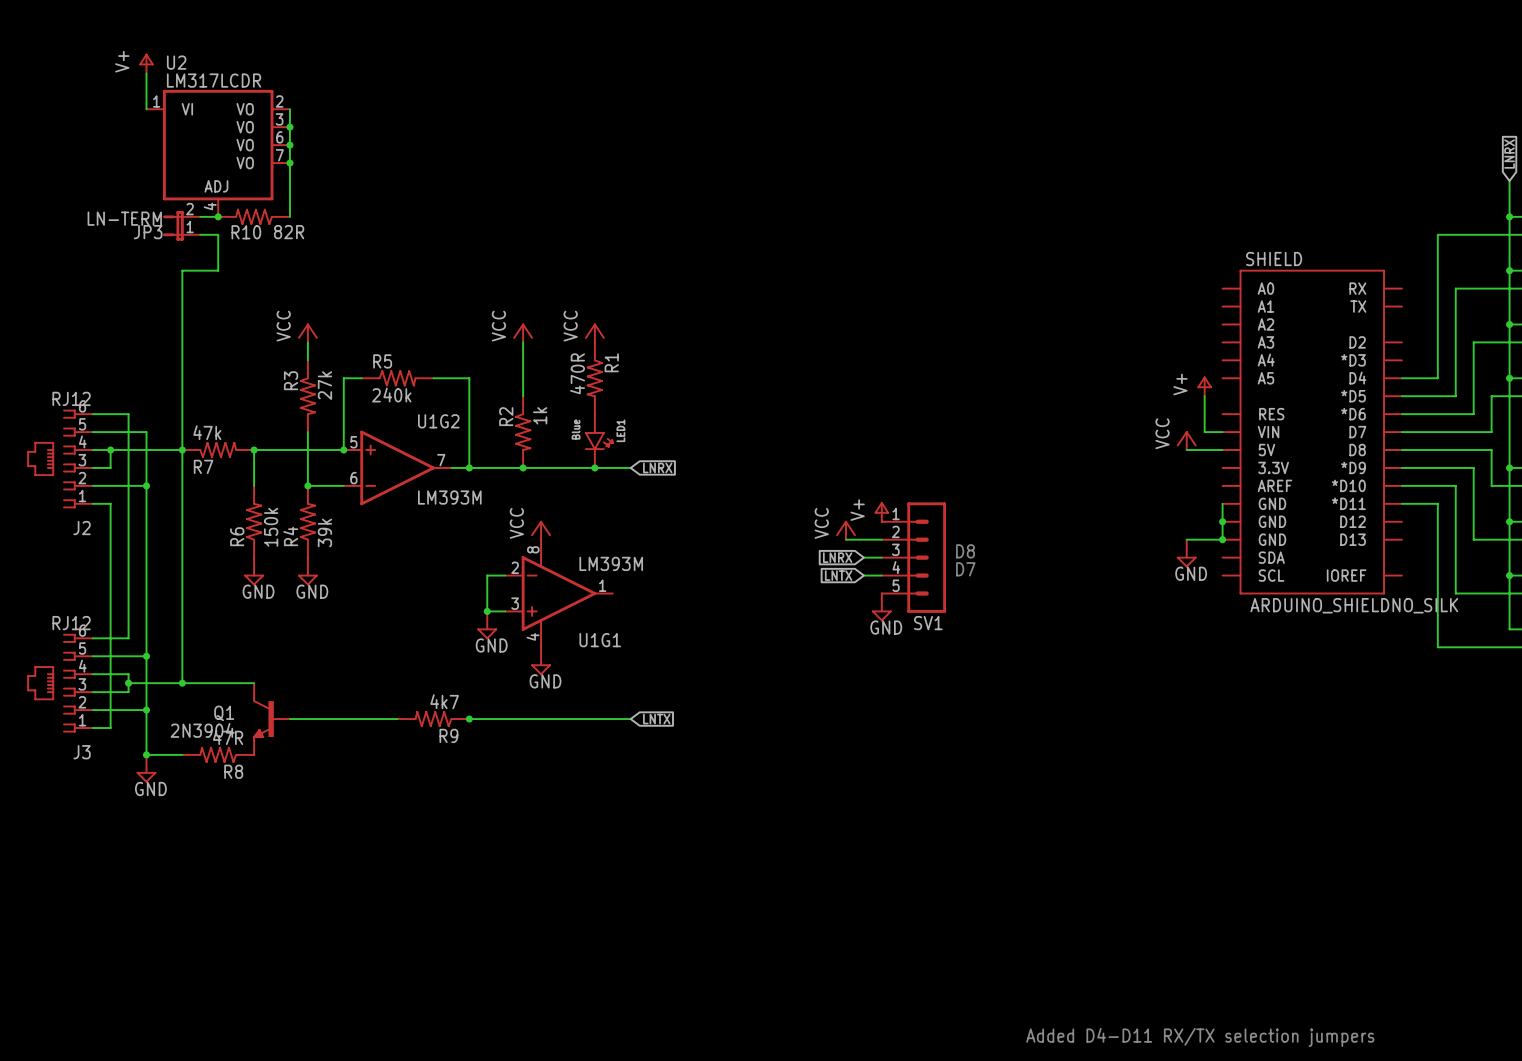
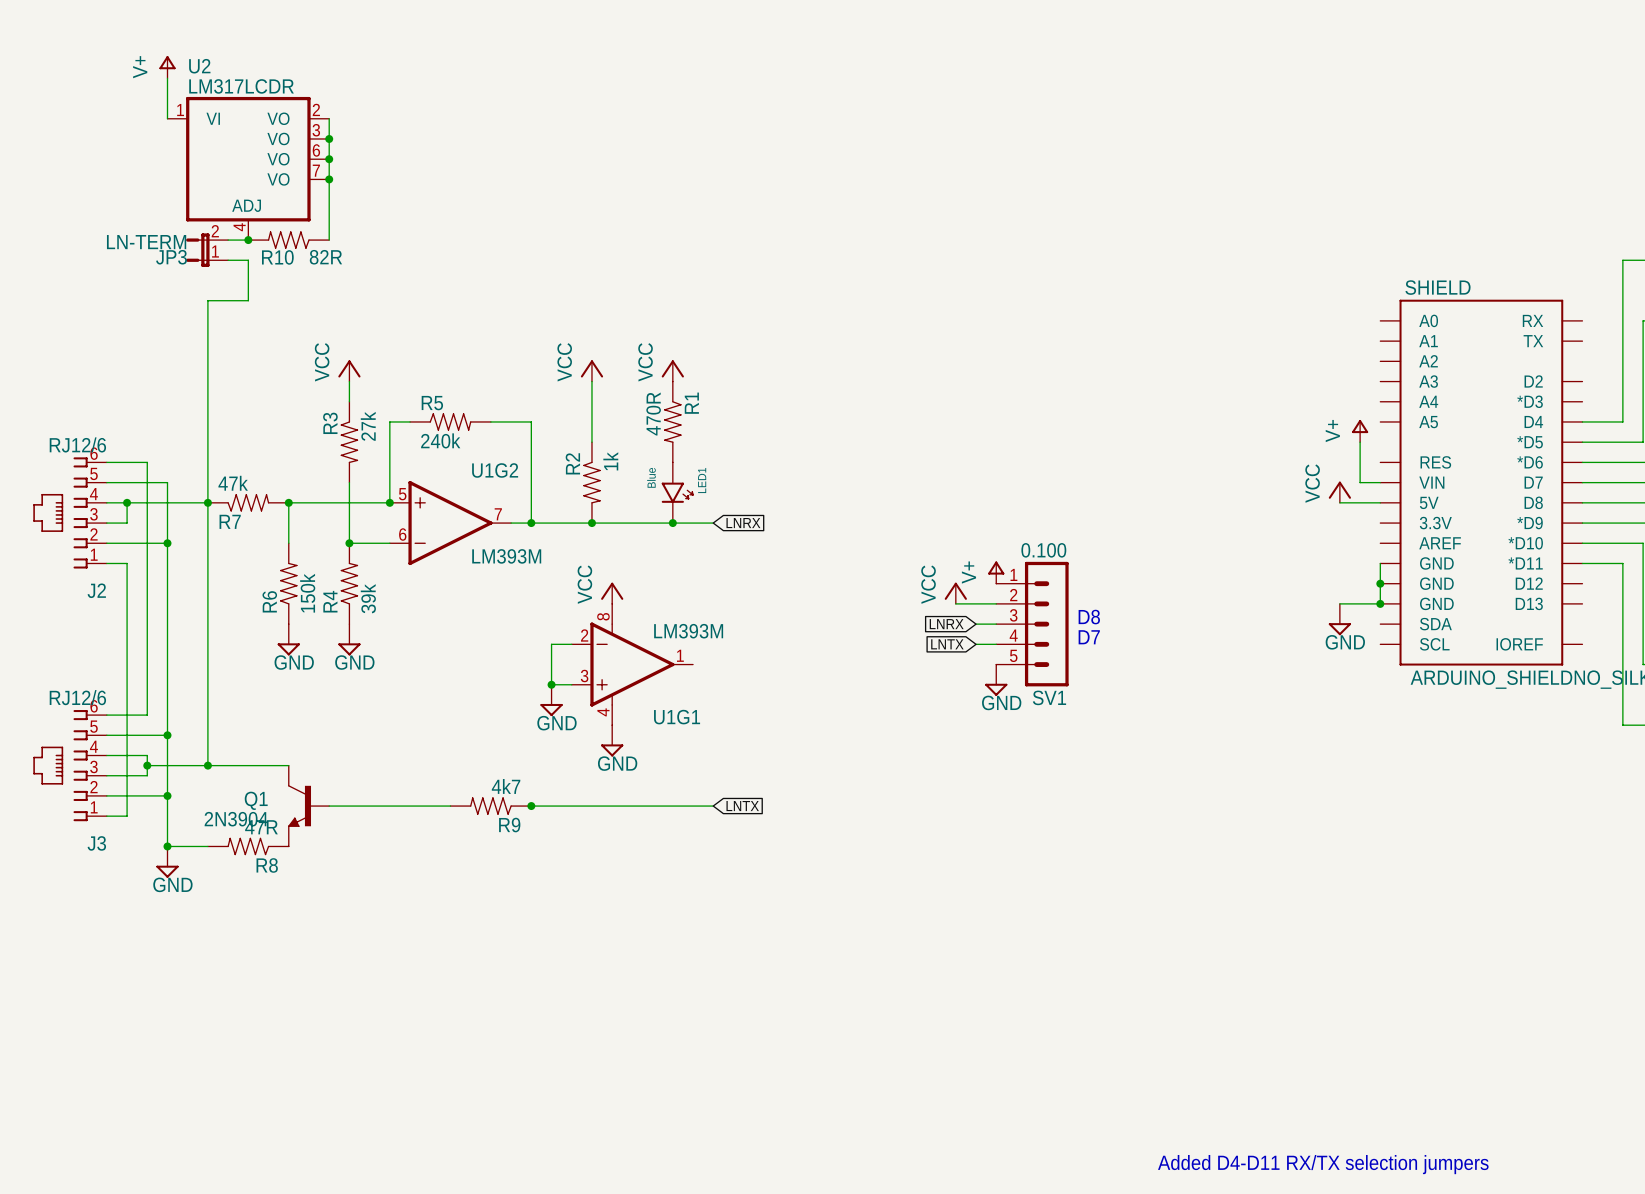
J2 value: RJ12 (71, 398) -> RJ12/6 (77, 444)
SV1 value: none -> 0.100 (1043, 550)
J3 value: RJ12 (71, 623) -> RJ12/6 (77, 697)

